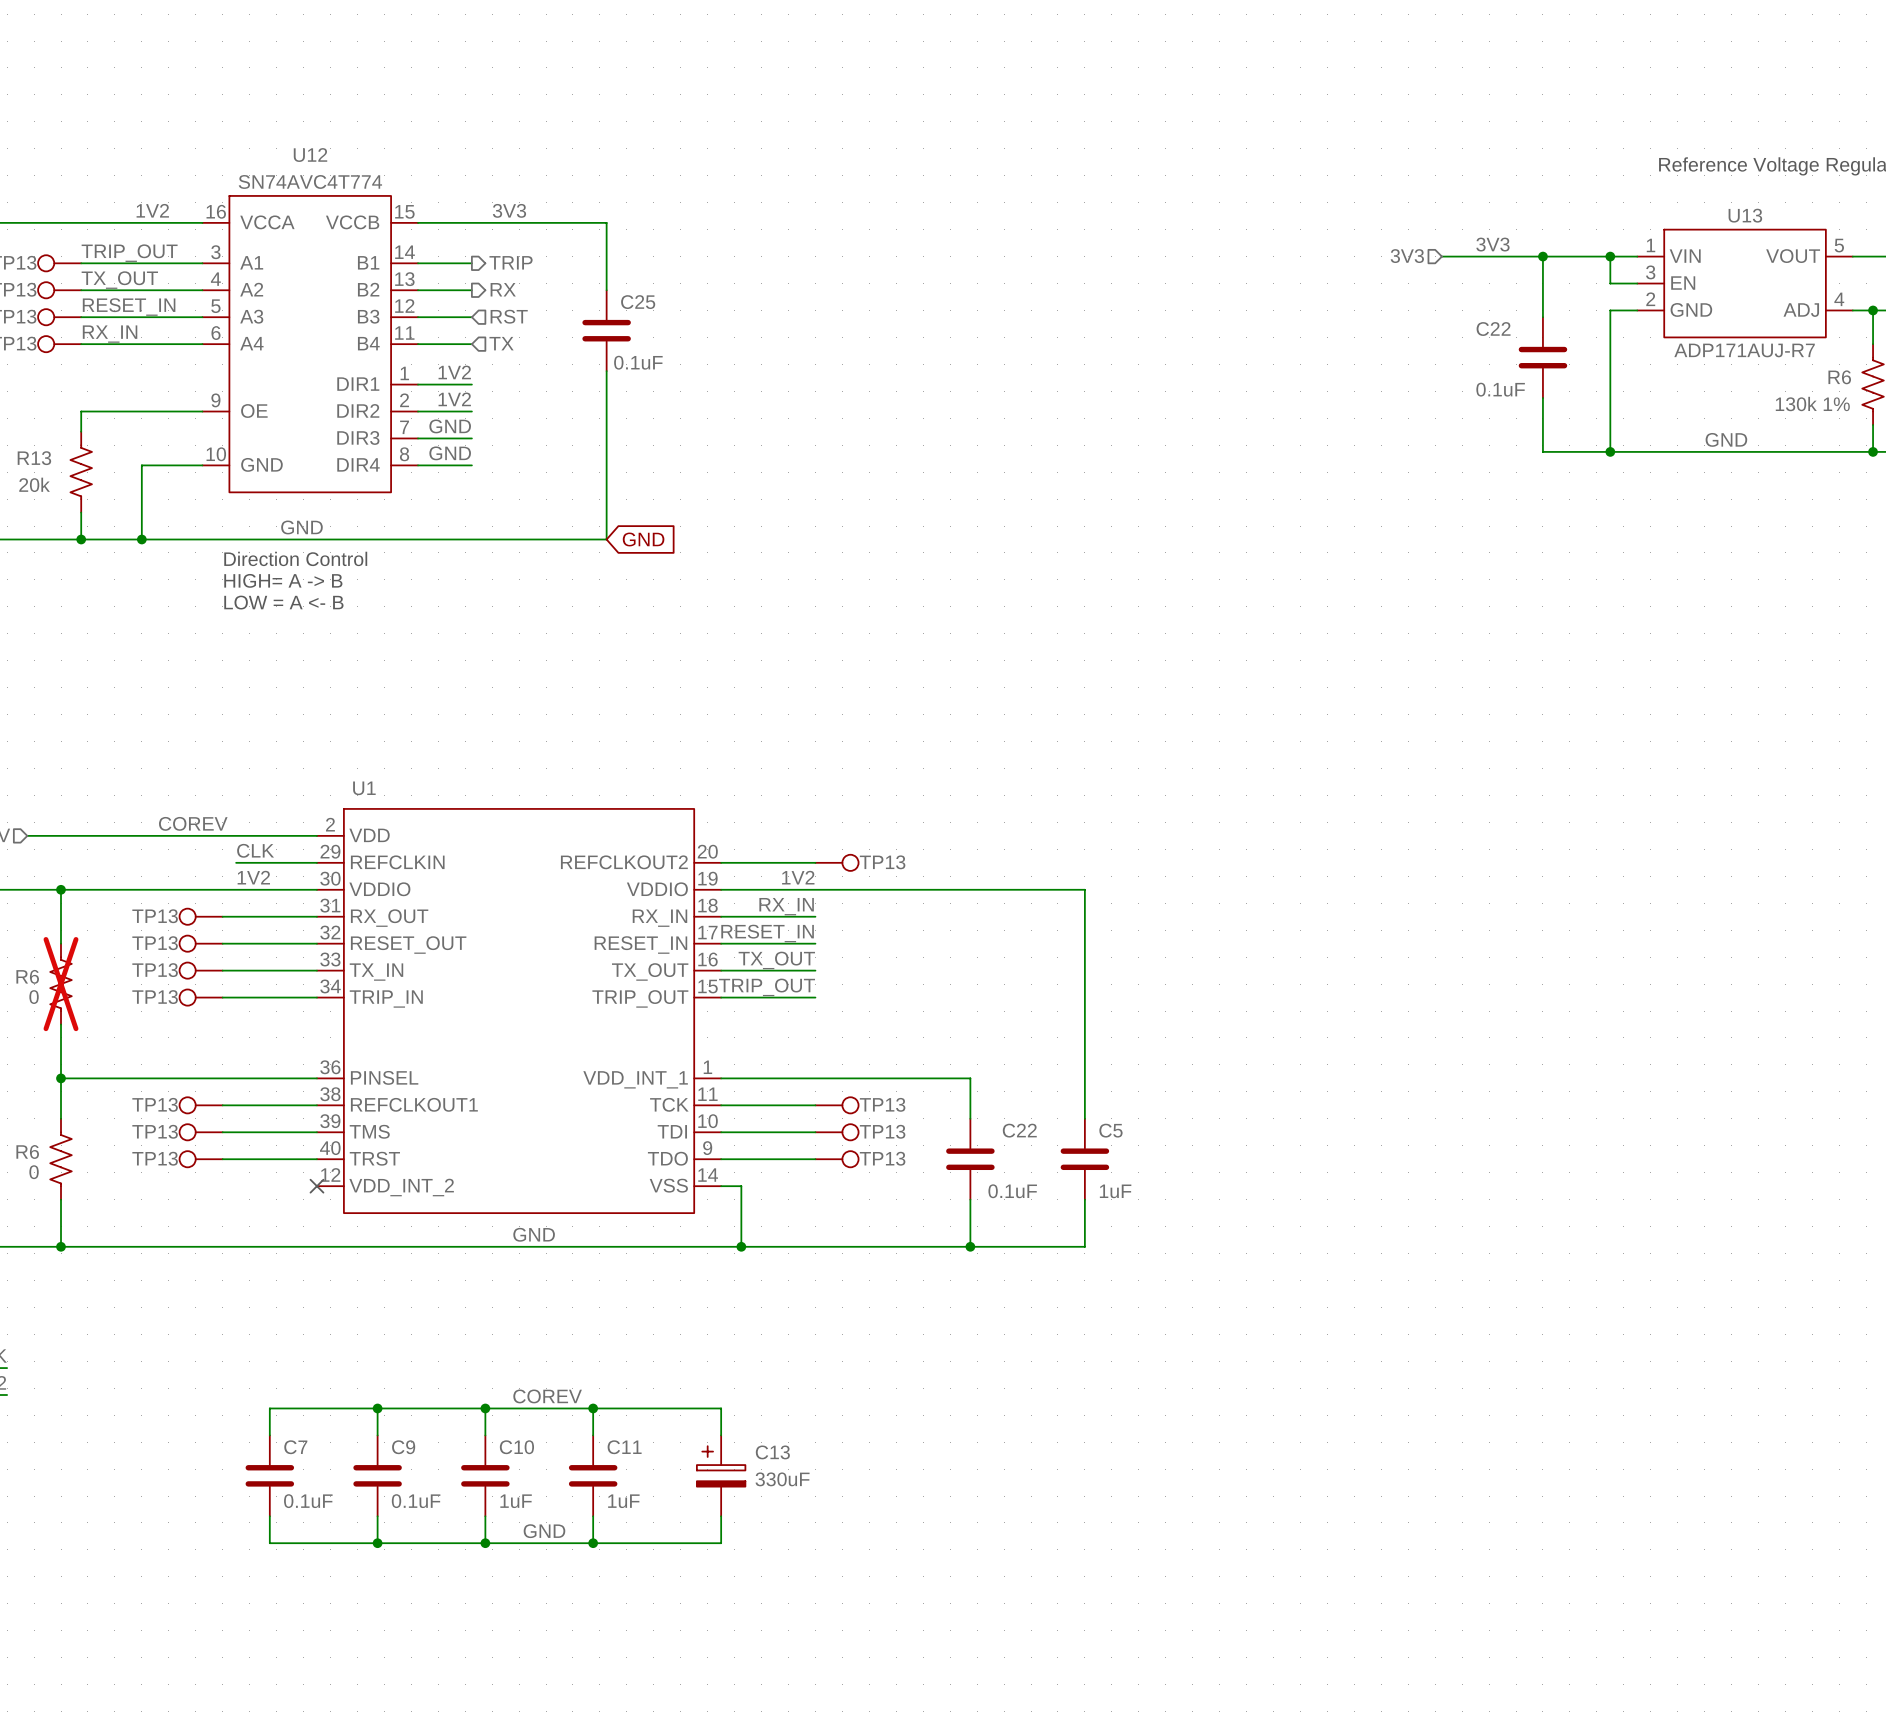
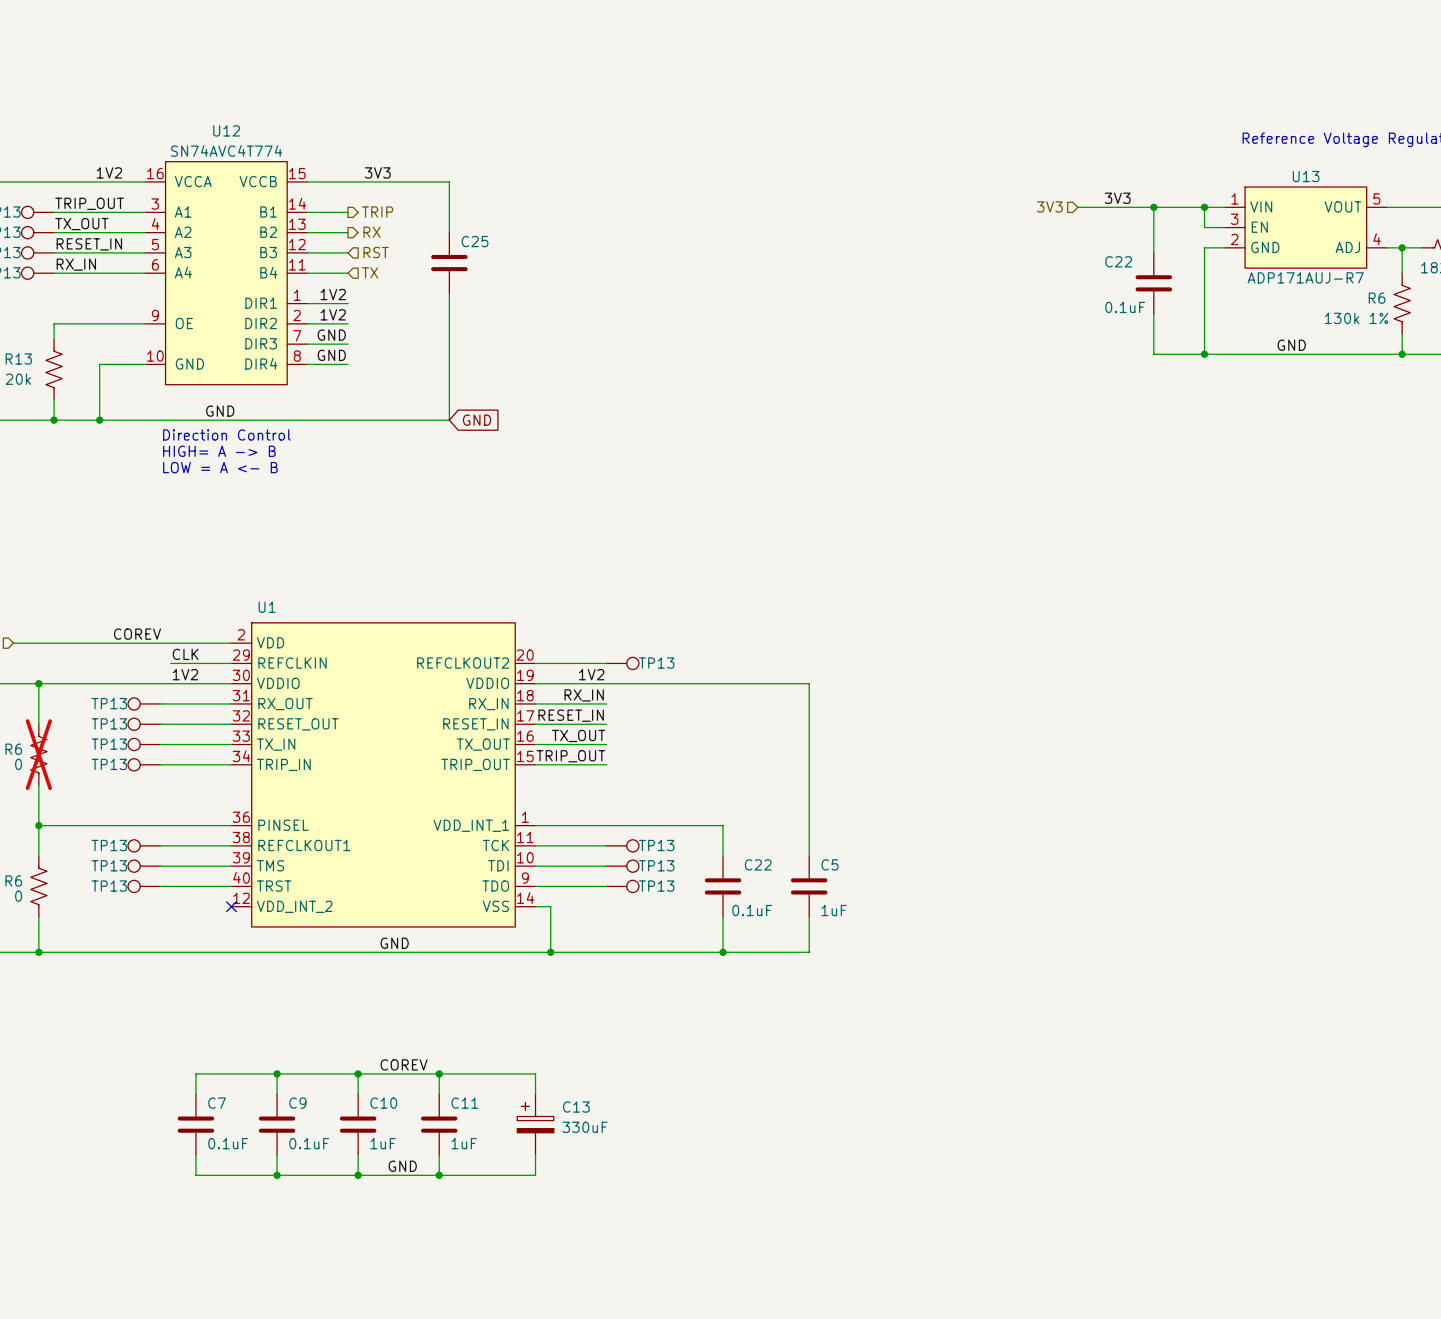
C25 value: 0.1uF (638, 362) -> none

